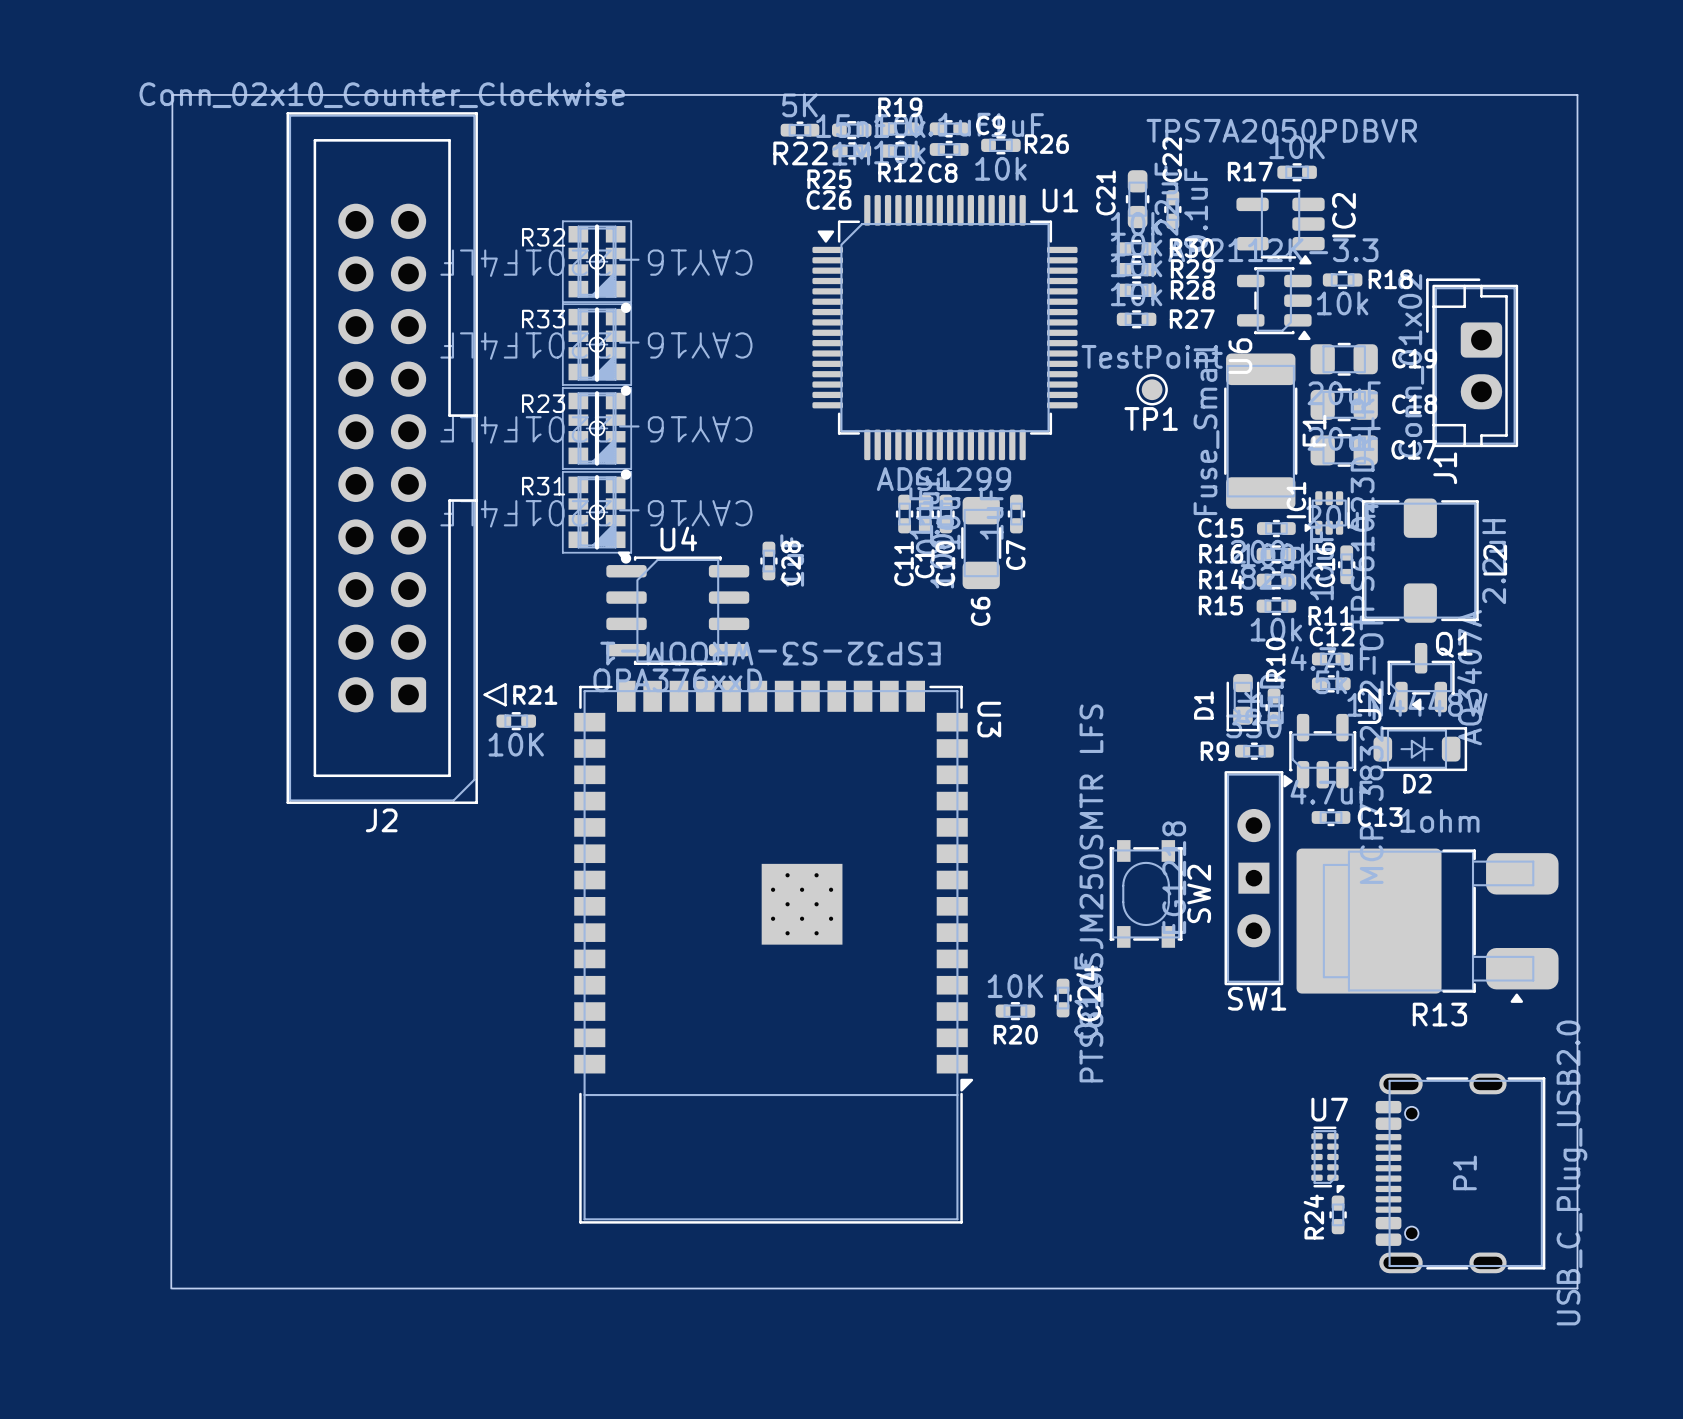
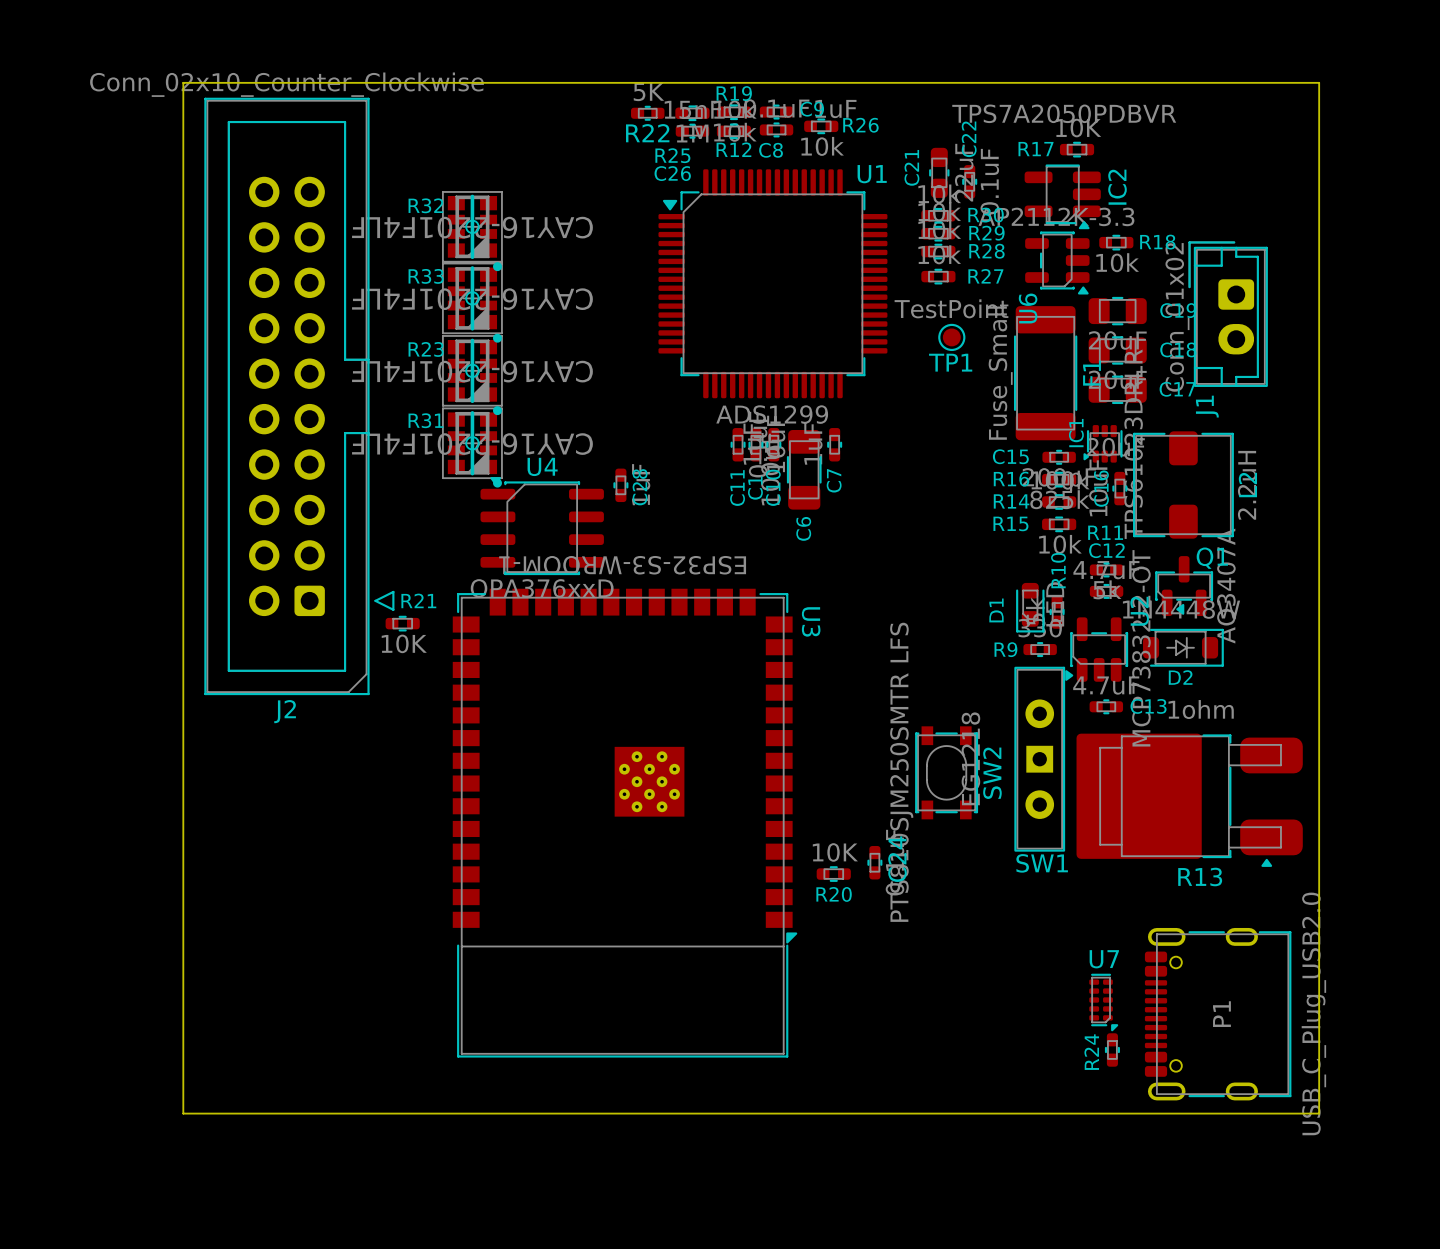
board edge: (262, 94) (172, 94) (171, 1288) -> (183, 82) (183, 1113)
board edge: (172, 1288) (262, 1288) -> none

